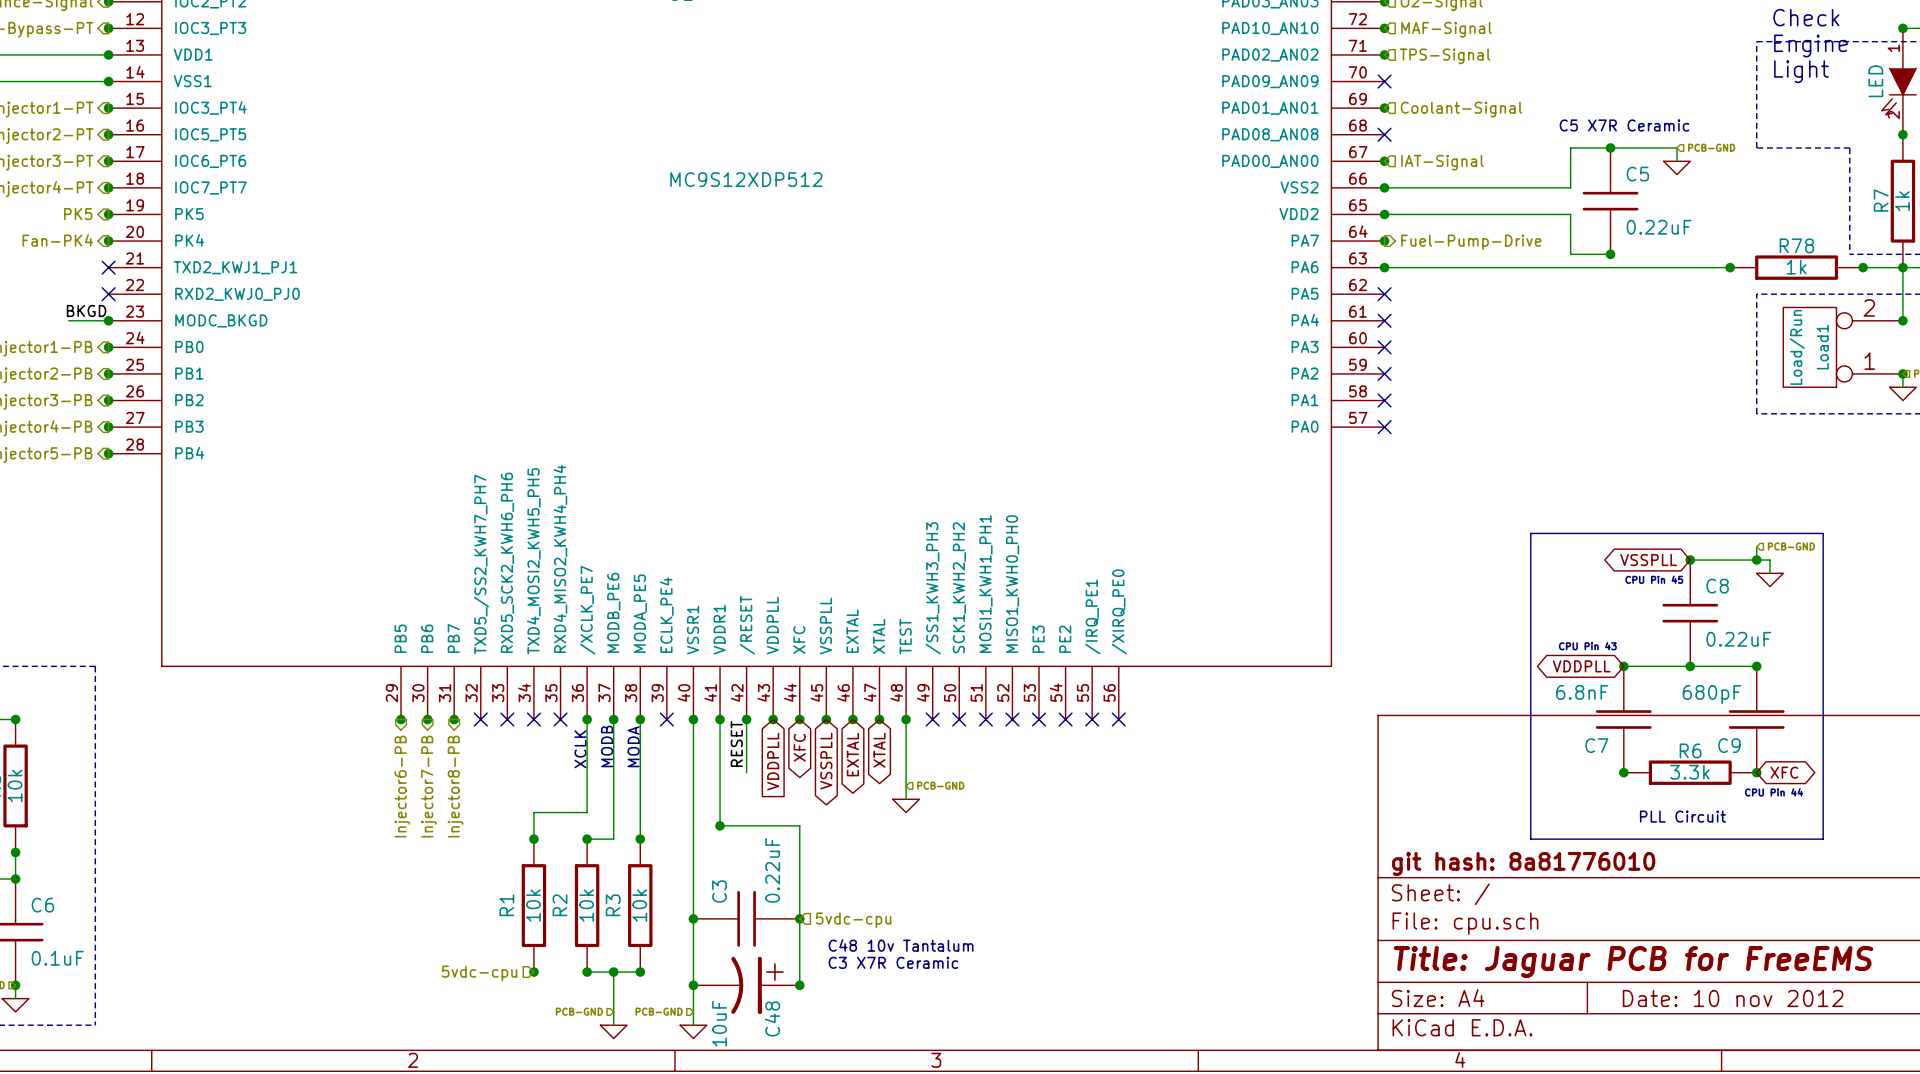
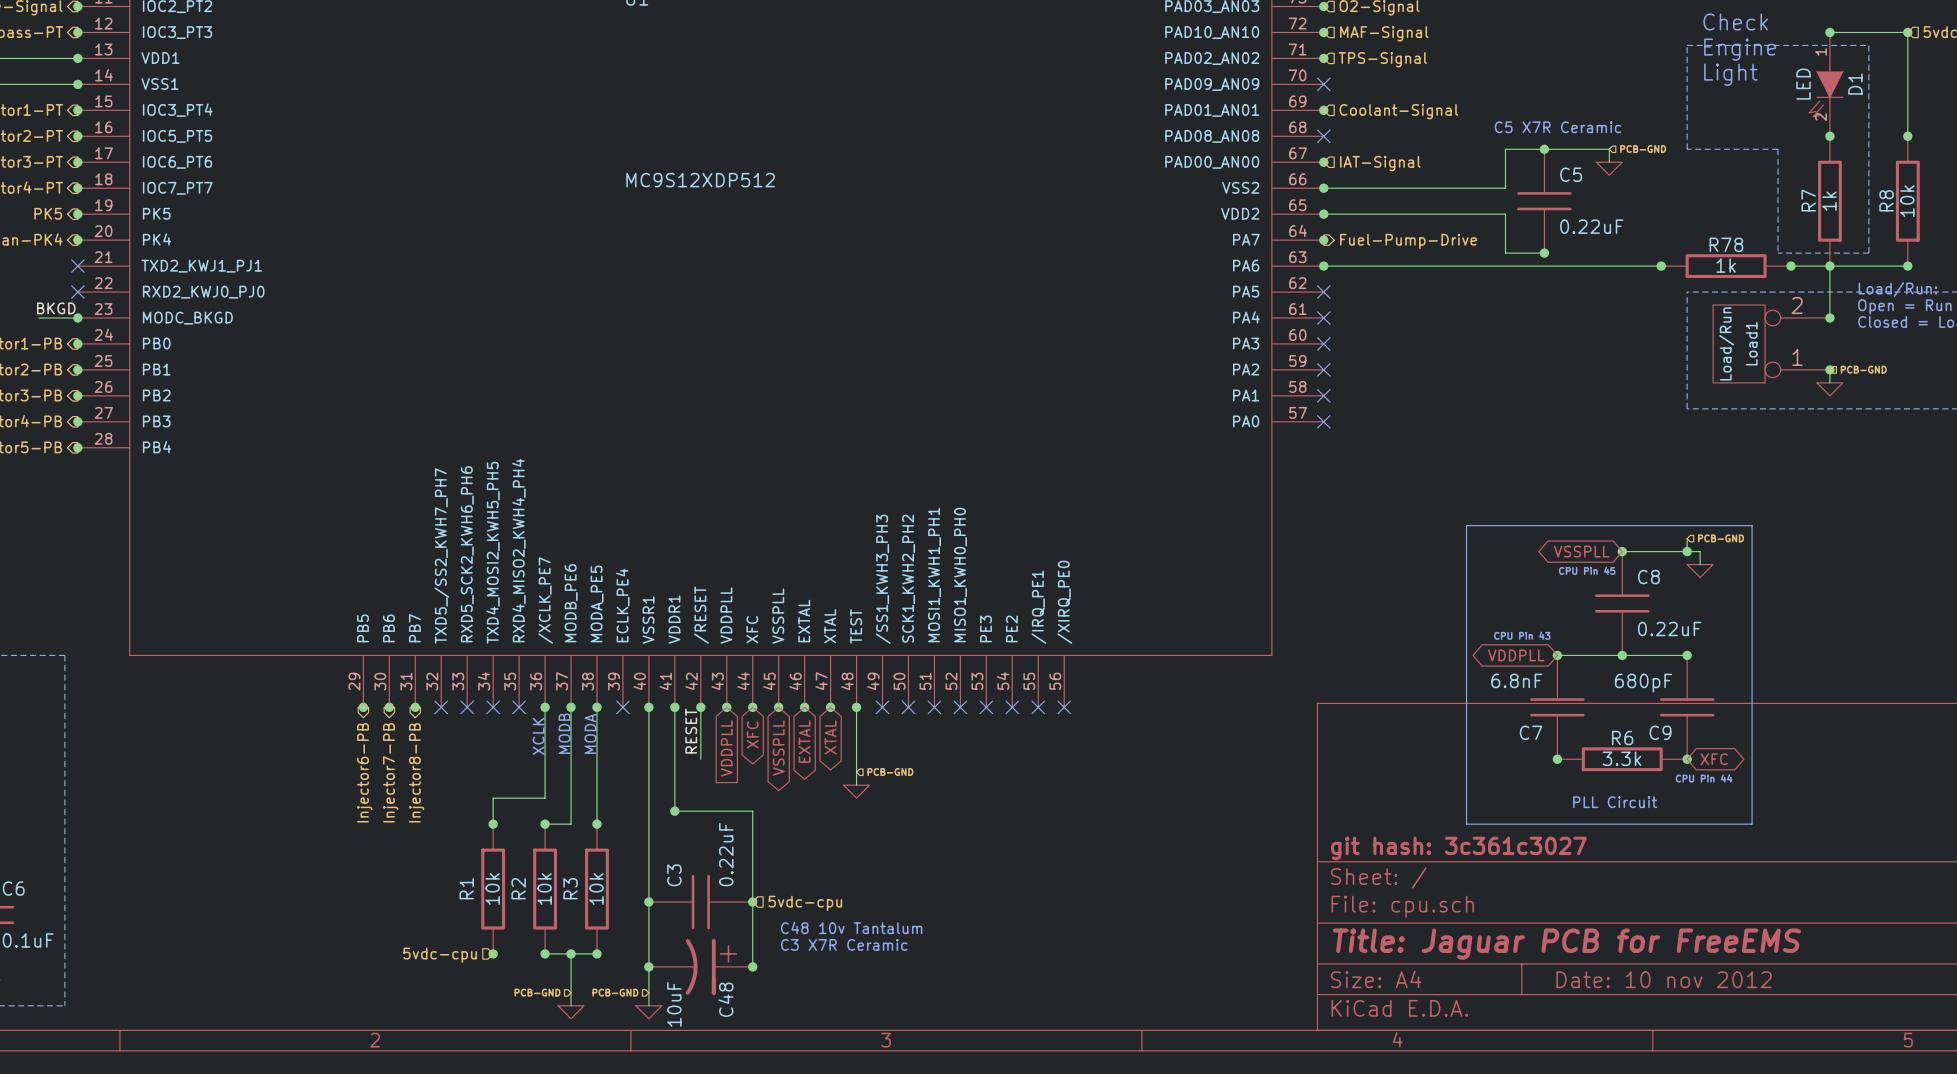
title block: git hash: 8a81776010 (1523, 864) -> git hash: 3c361c3027 (1458, 848)

